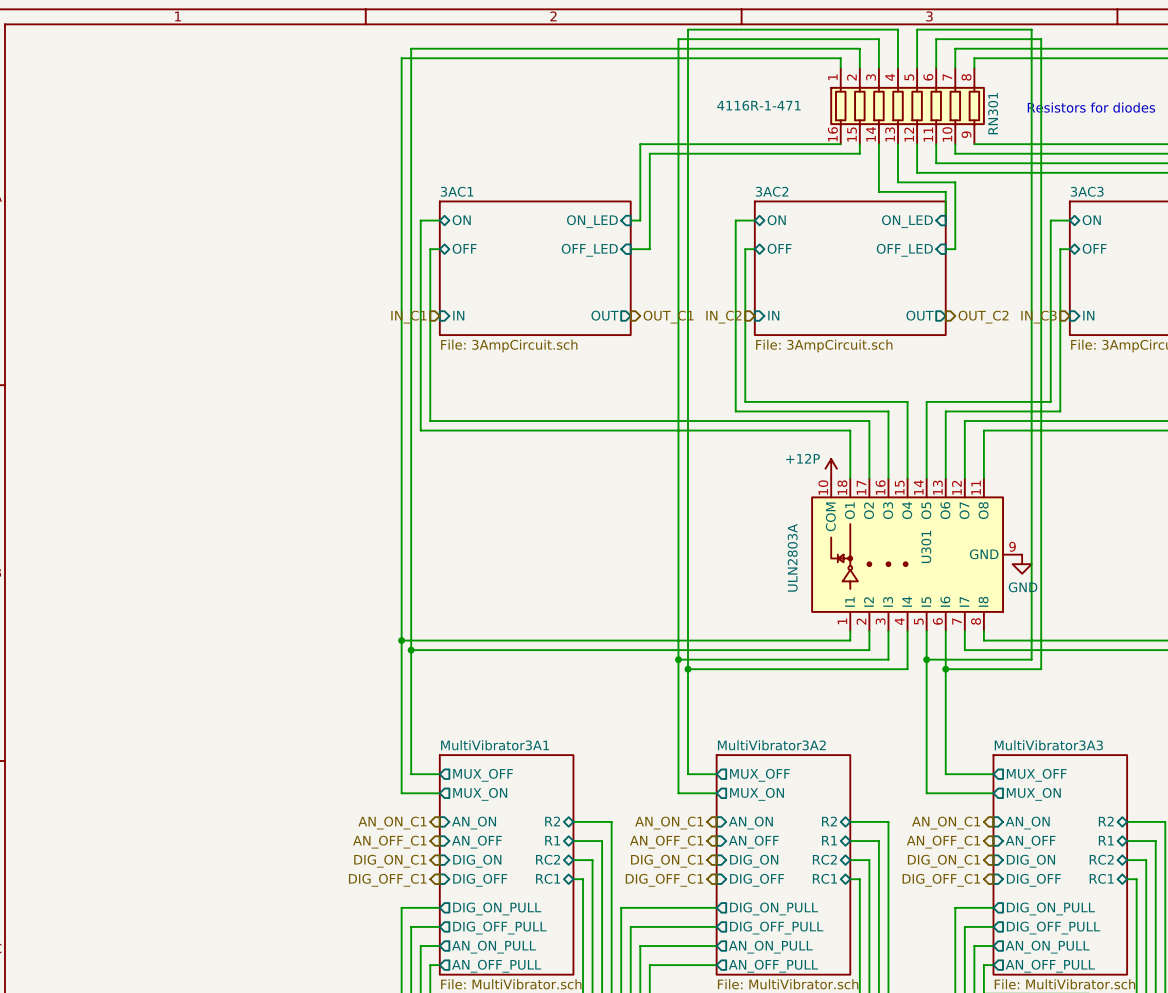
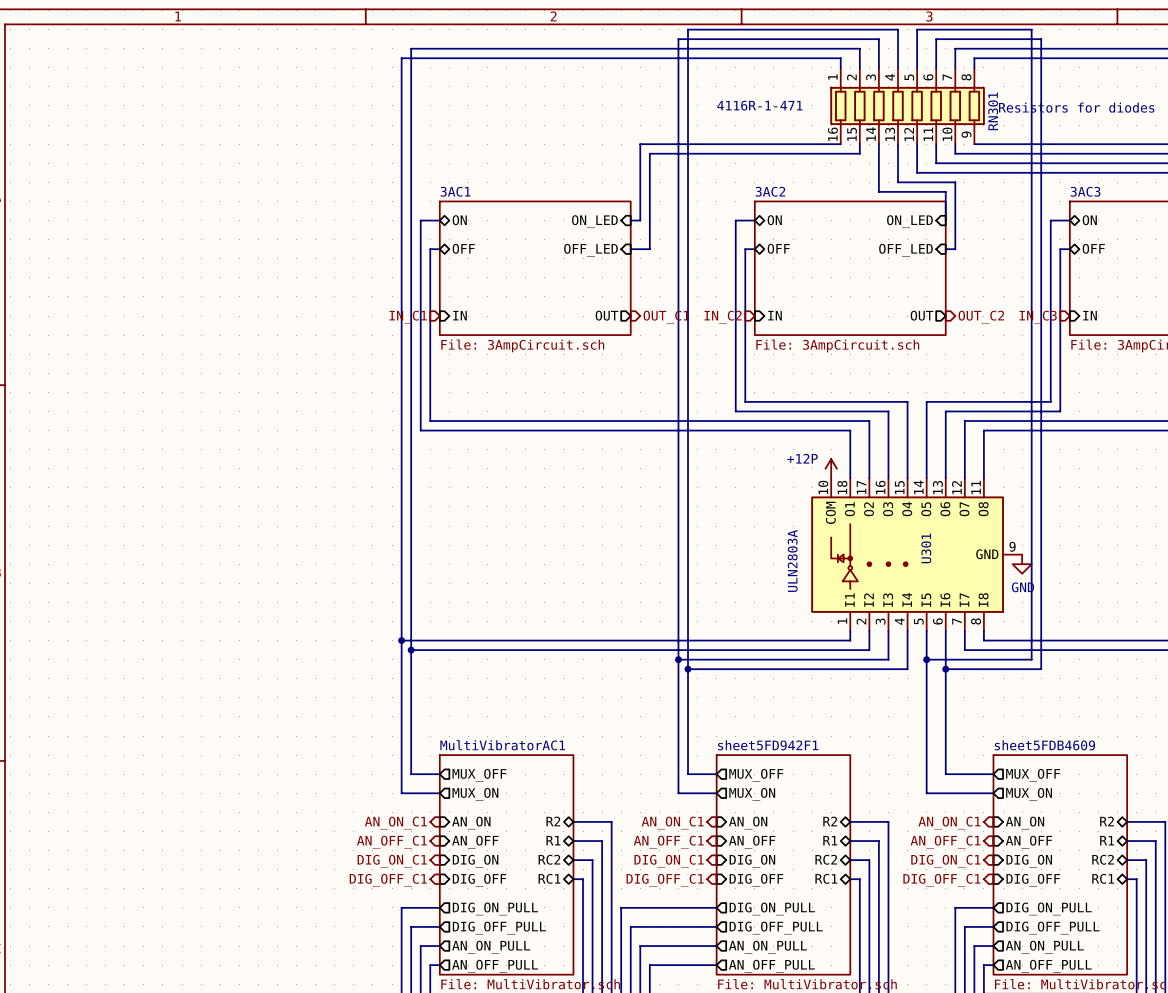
sheet MultiVibrator3A1 name: MultiVibrator3A1 (495, 745) -> MultiVibratorAC1 (502, 745)
sheet MultiVibrator3A2 name: MultiVibrator3A2 (771, 745) -> sheet5FD942F1 (768, 745)
sheet MultiVibrator3A3 name: MultiVibrator3A3 (1048, 745) -> sheet5FDB4609 (1044, 745)

